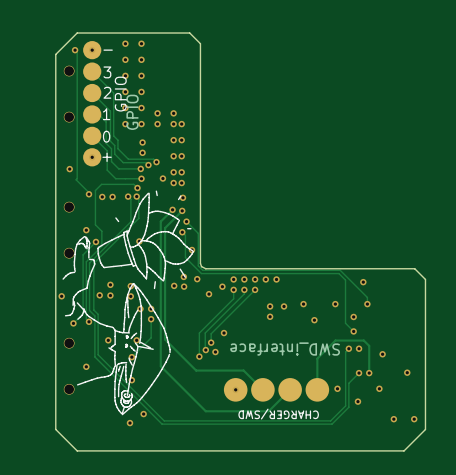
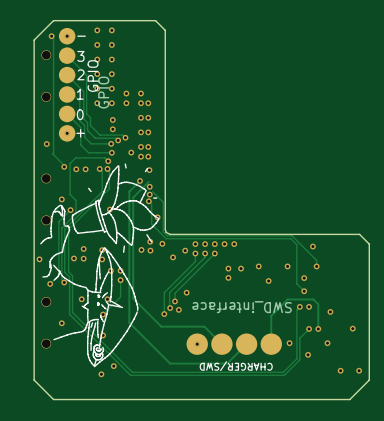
via: (182, 210) -> none
via: none -> (149, 186)
via: (186, 221) -> none
via: none -> (149, 194)

